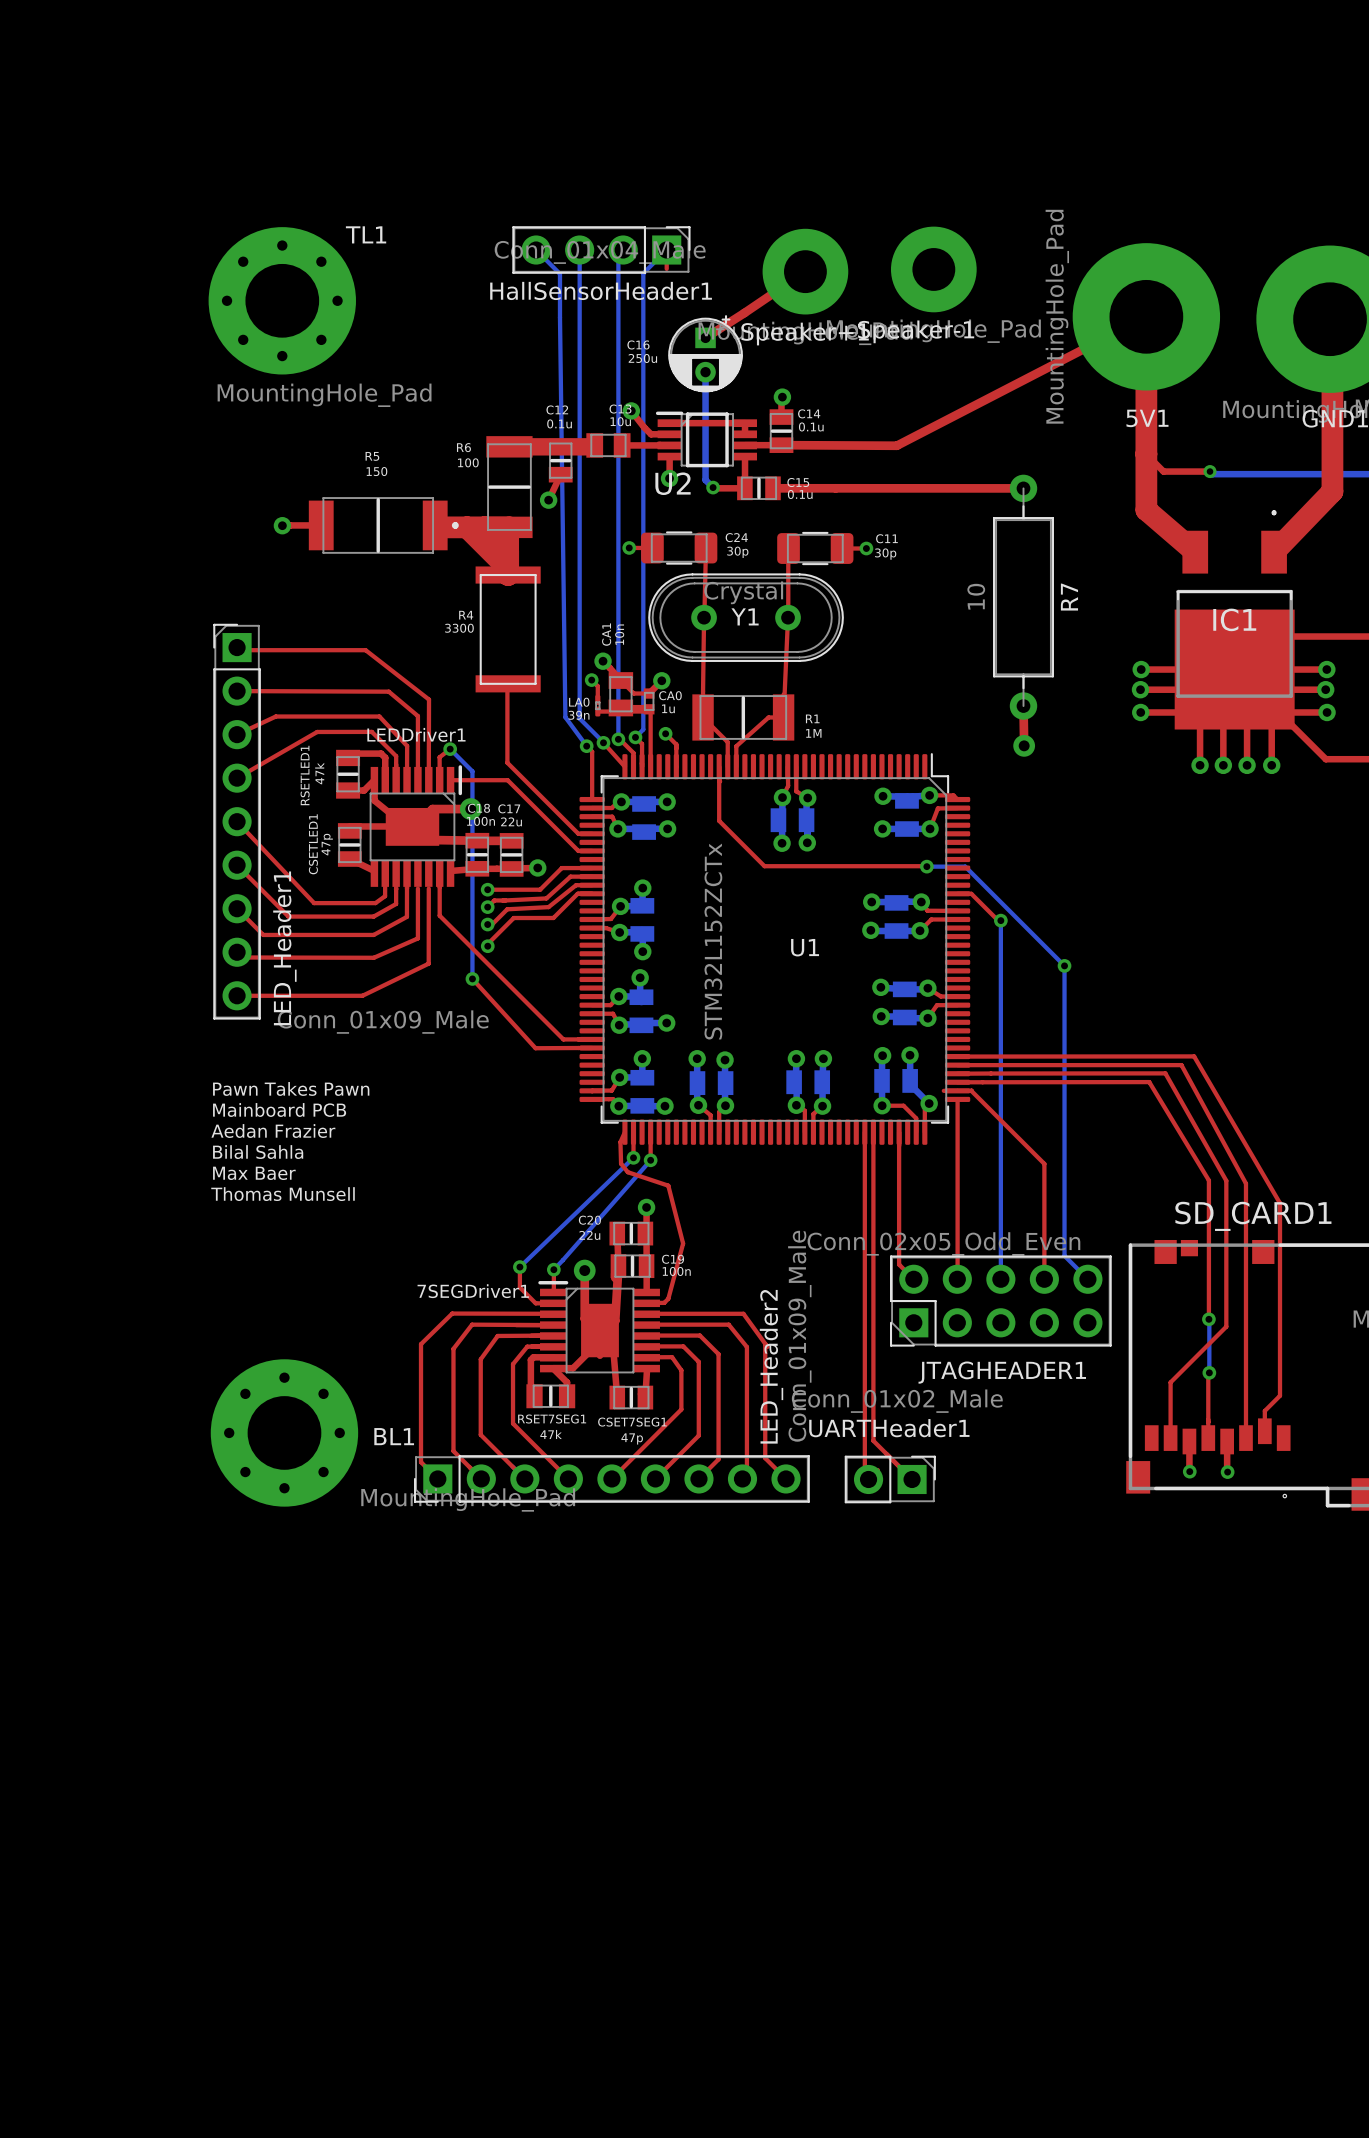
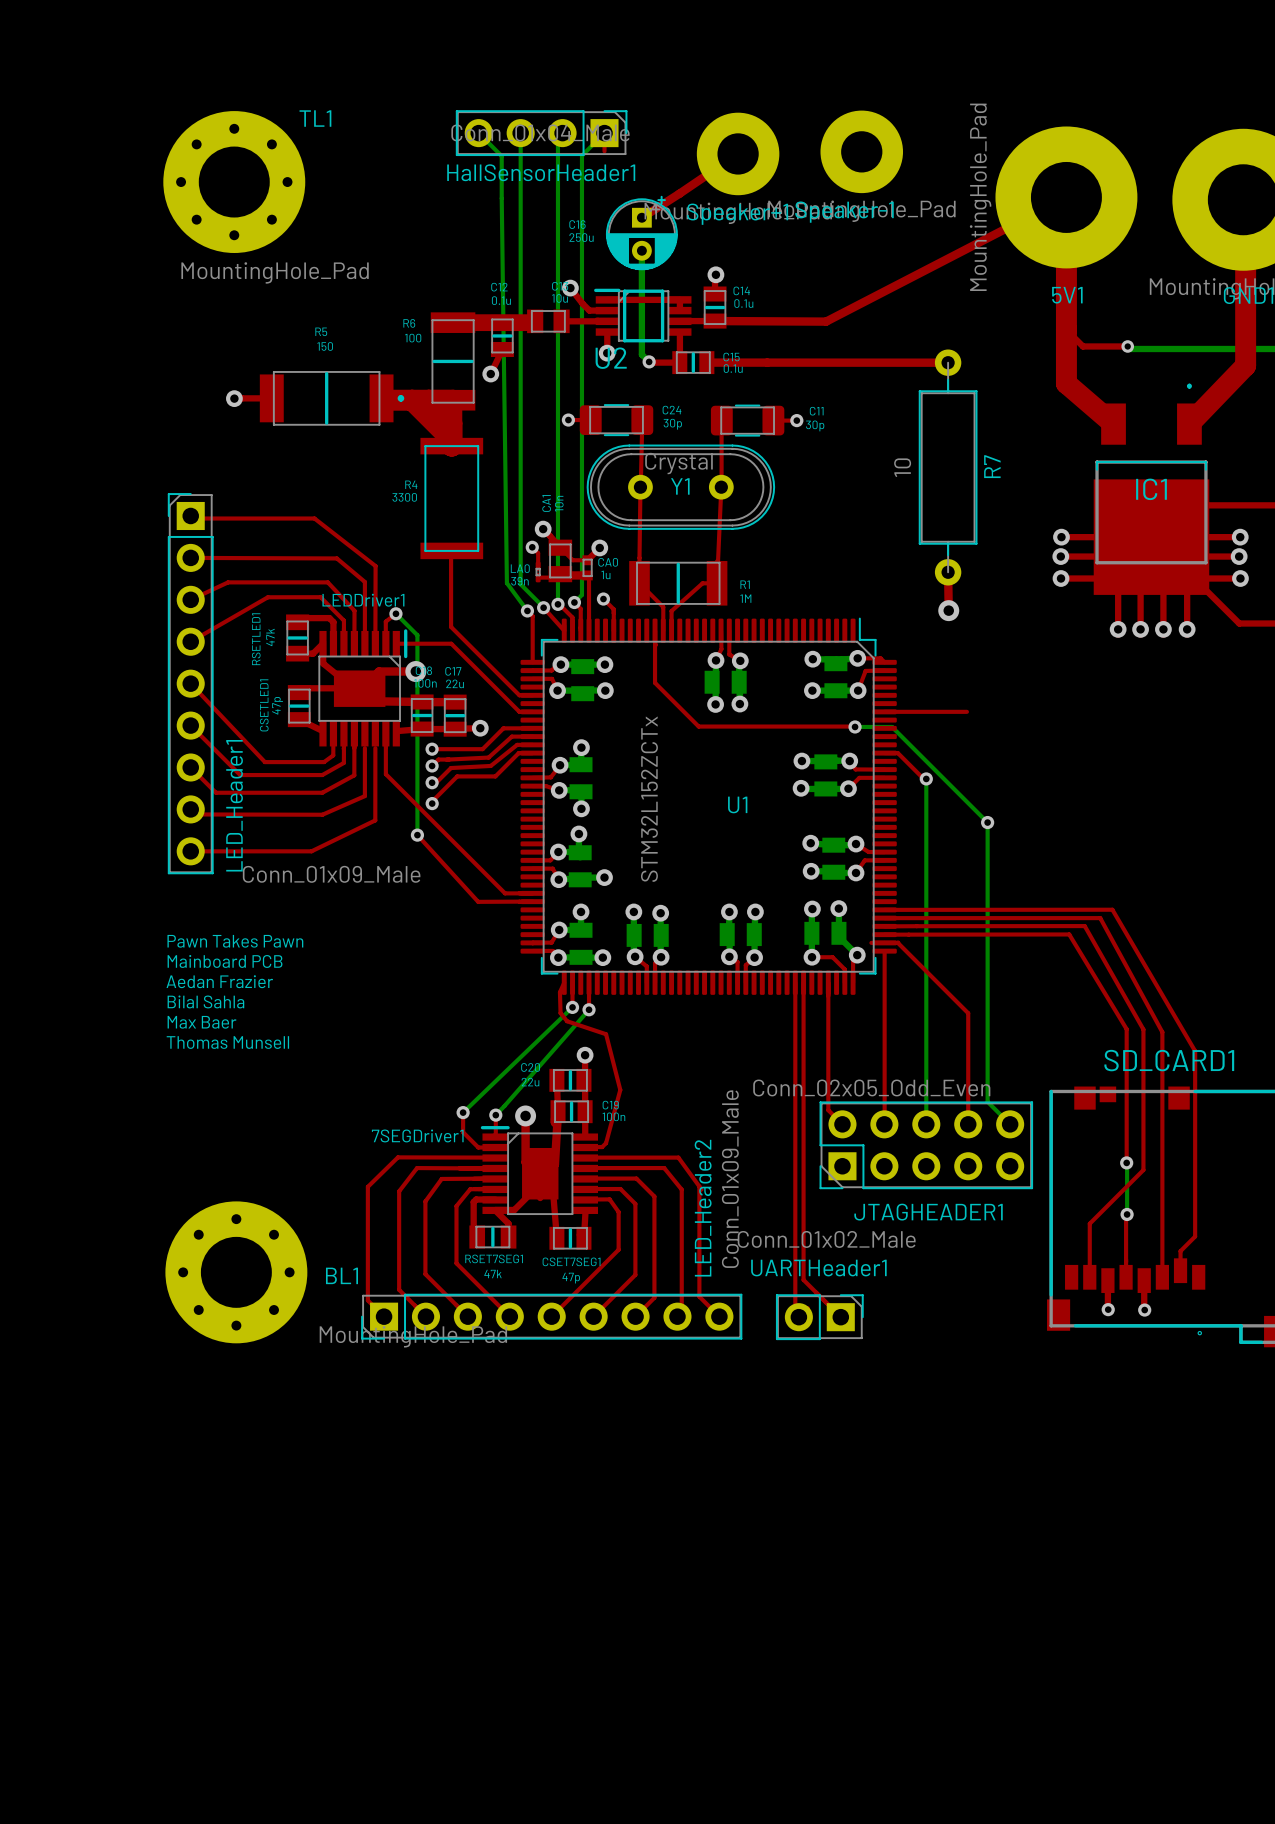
top track: none -> (884, 711) (966, 711)

